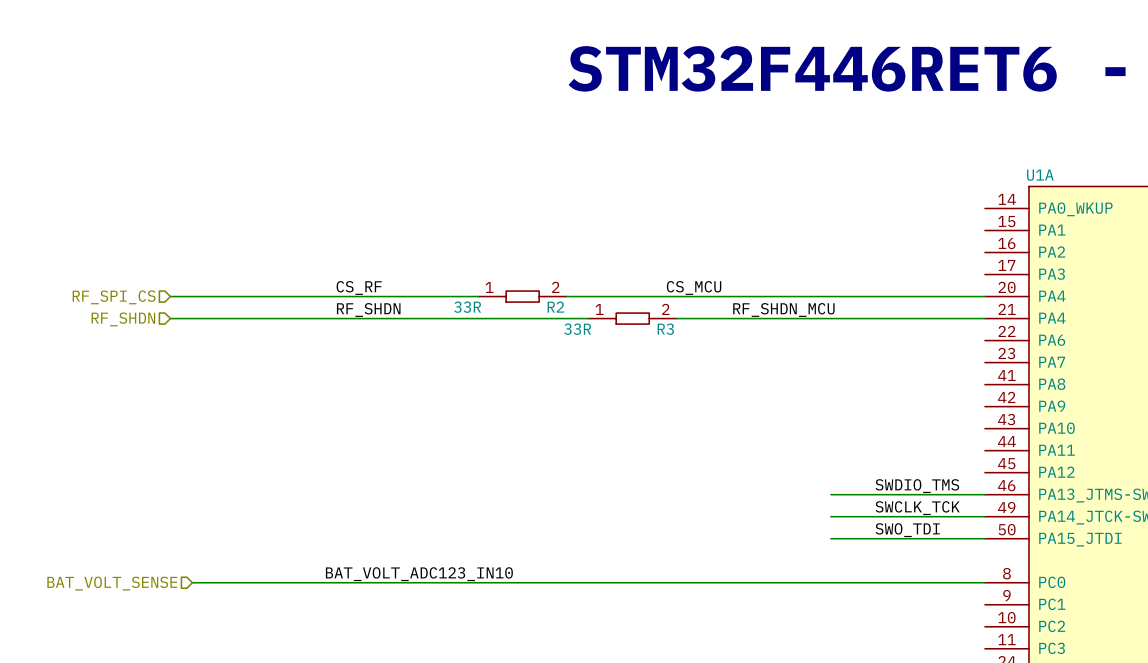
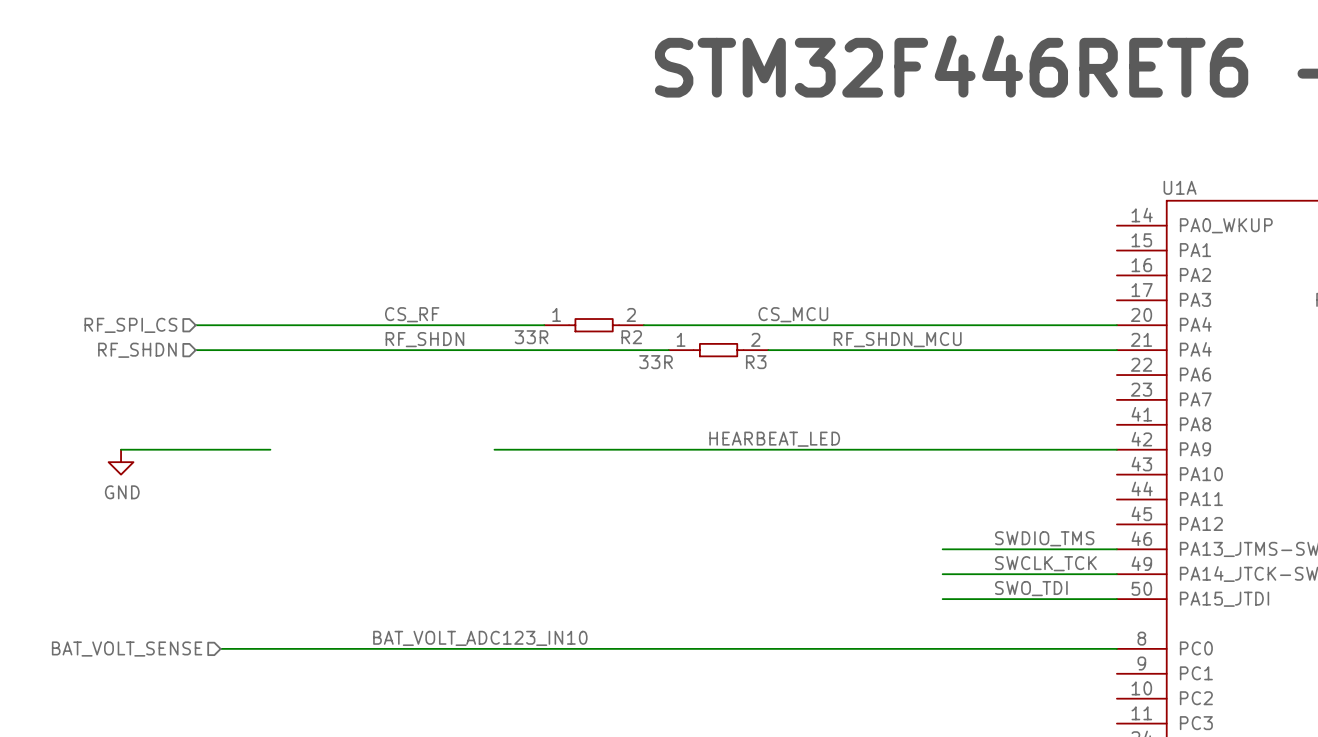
label: none -> HEARBEAT_LED (774, 439)
wire: none -> (121, 449) (270, 449)
wire: none -> (494, 449) (1116, 449)
power symbol: none -> GND (121, 462)

